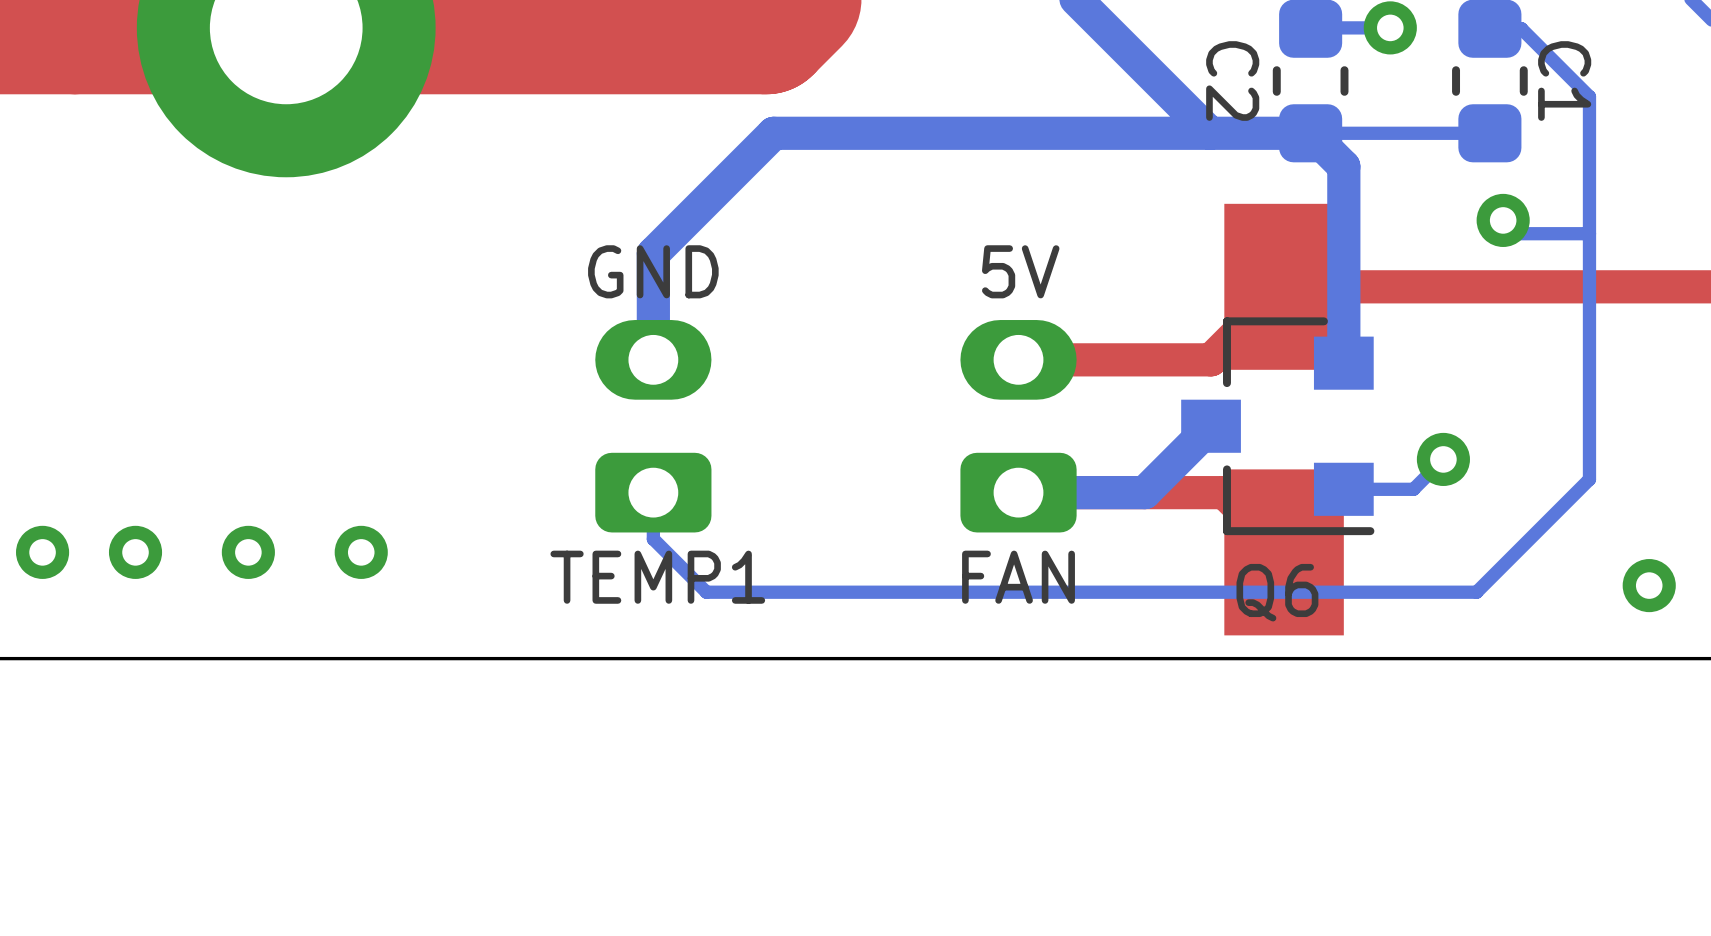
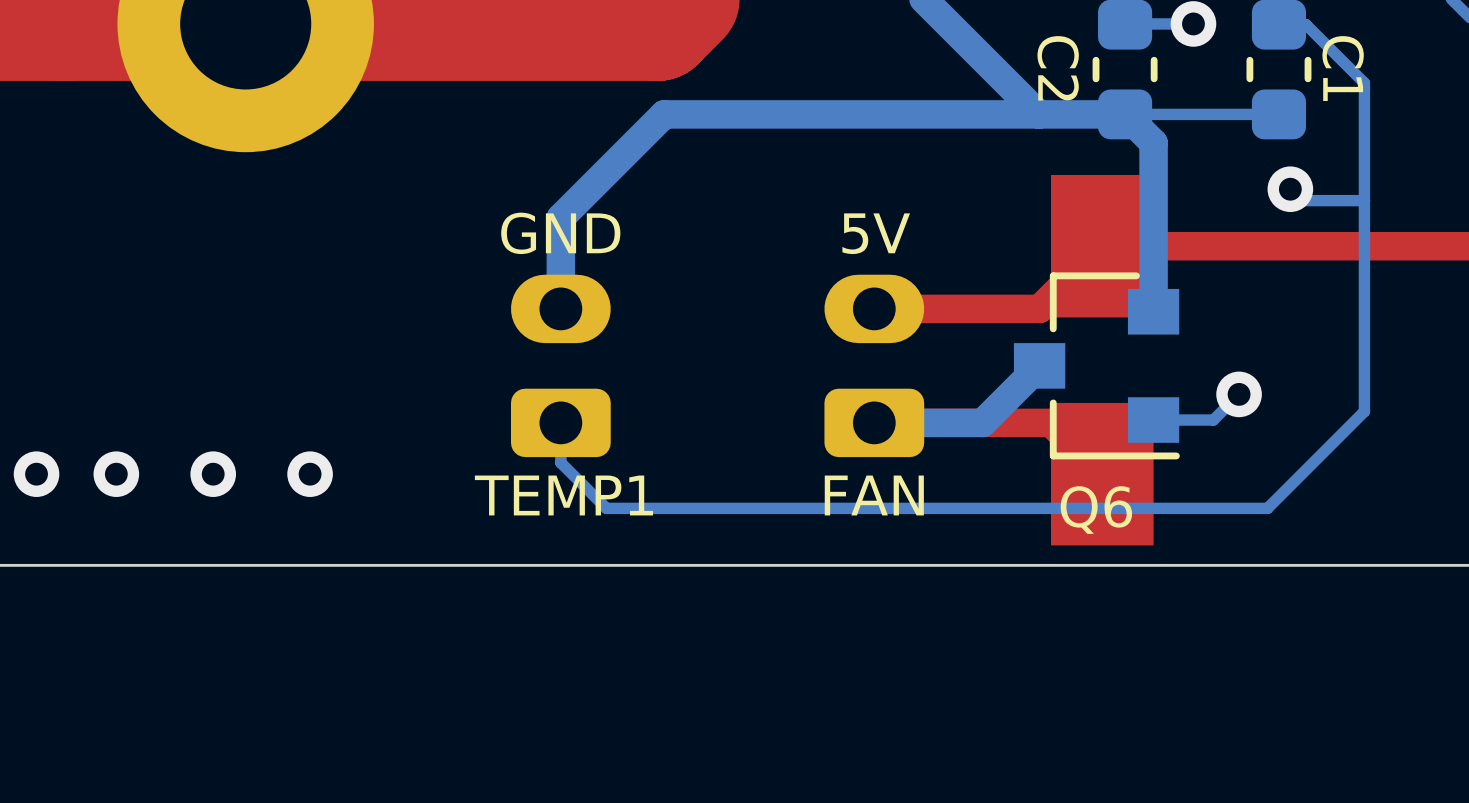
via: (1649, 585) -> none

